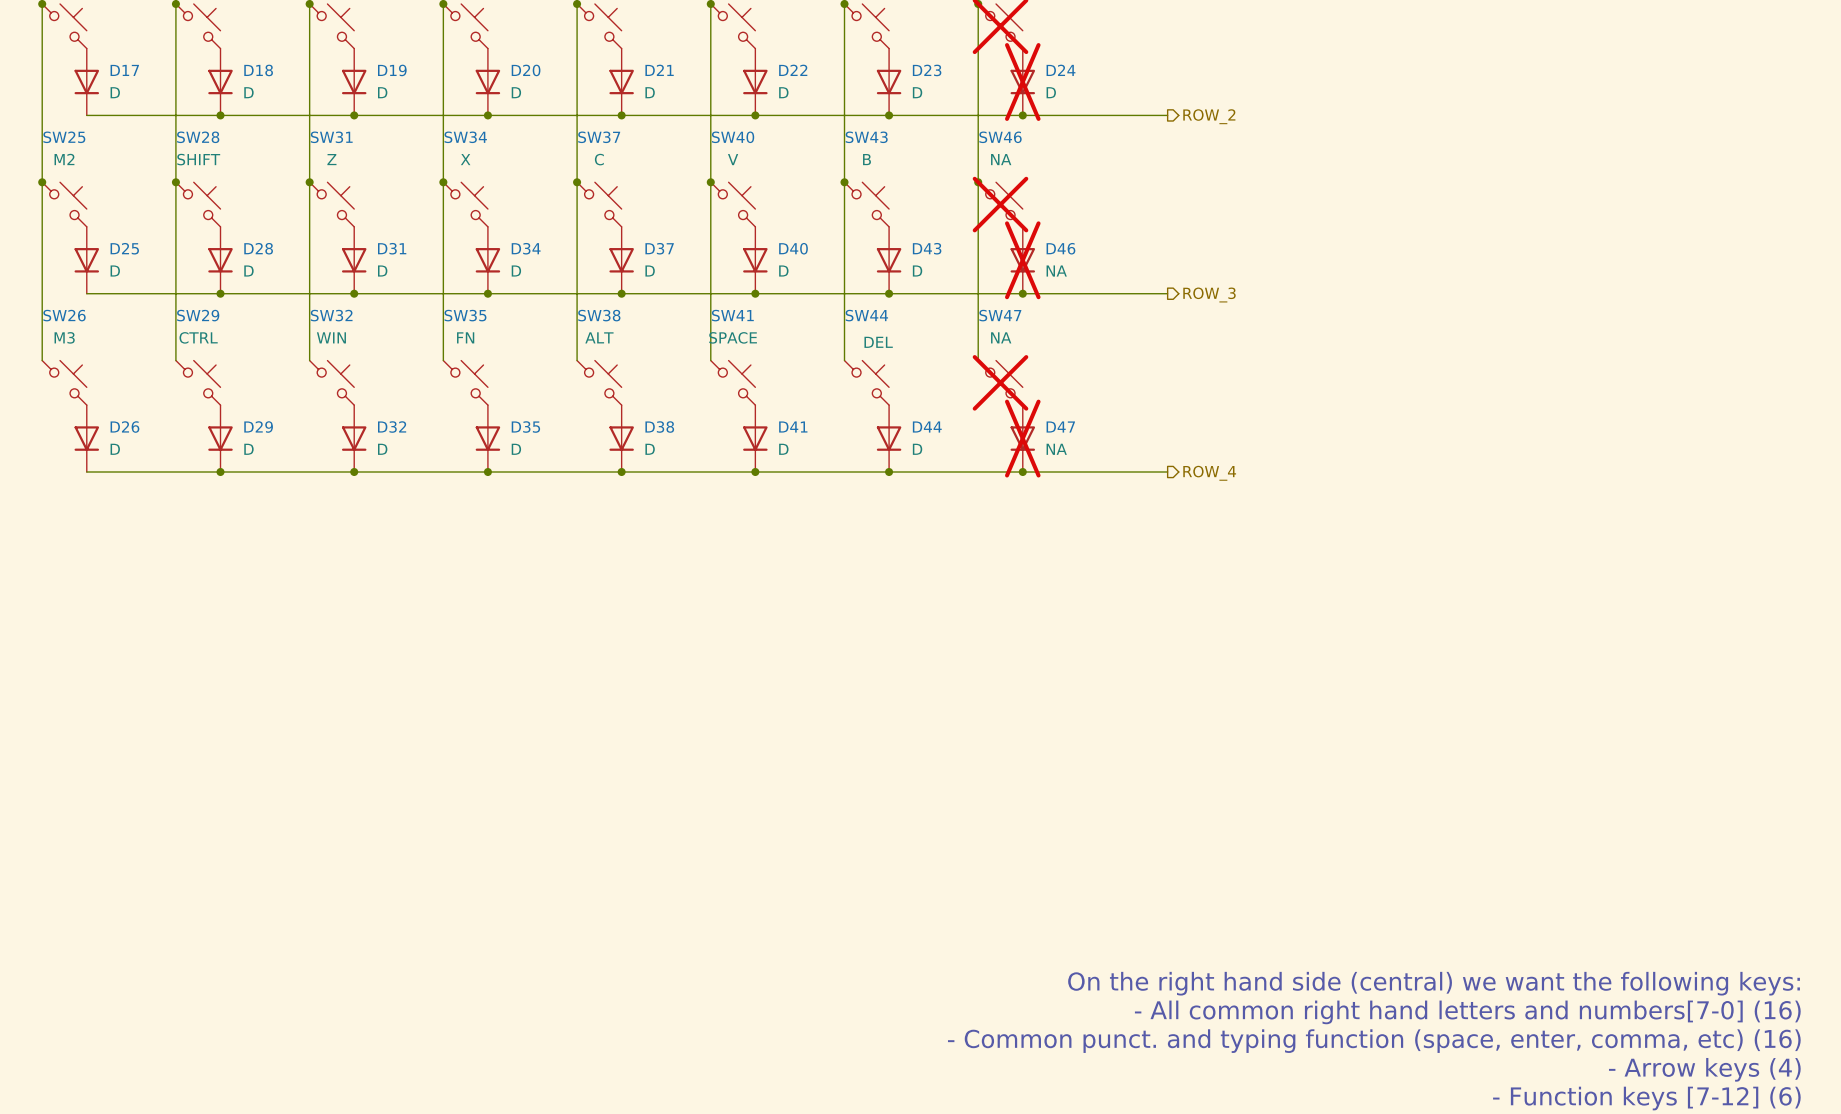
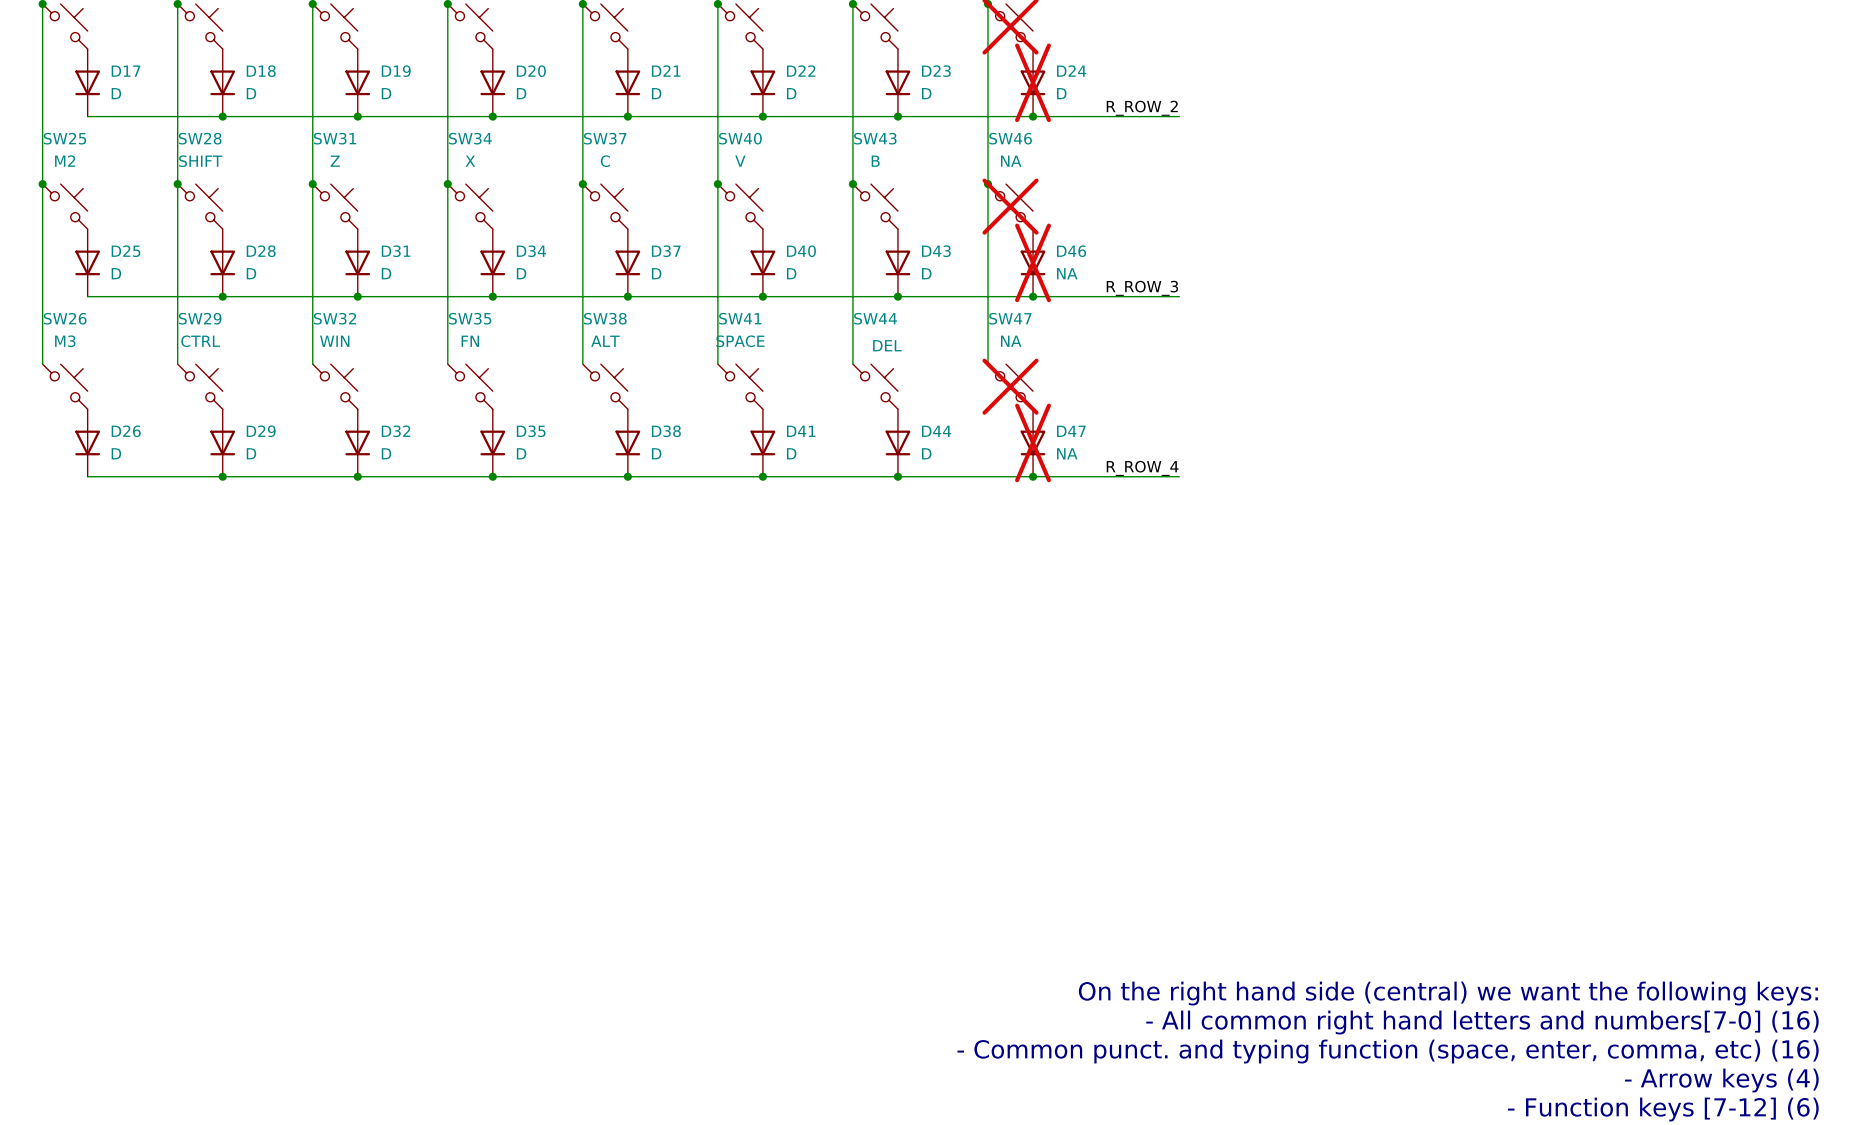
label: none -> R_ROW_2 (1142, 108)
hierarchical label: ROW_2 (1209, 116) -> none
label: none -> R_ROW_3 (1142, 288)
hierarchical label: ROW_3 (1209, 294) -> none
label: none -> R_ROW_4 (1142, 468)
hierarchical label: ROW_4 (1209, 473) -> none

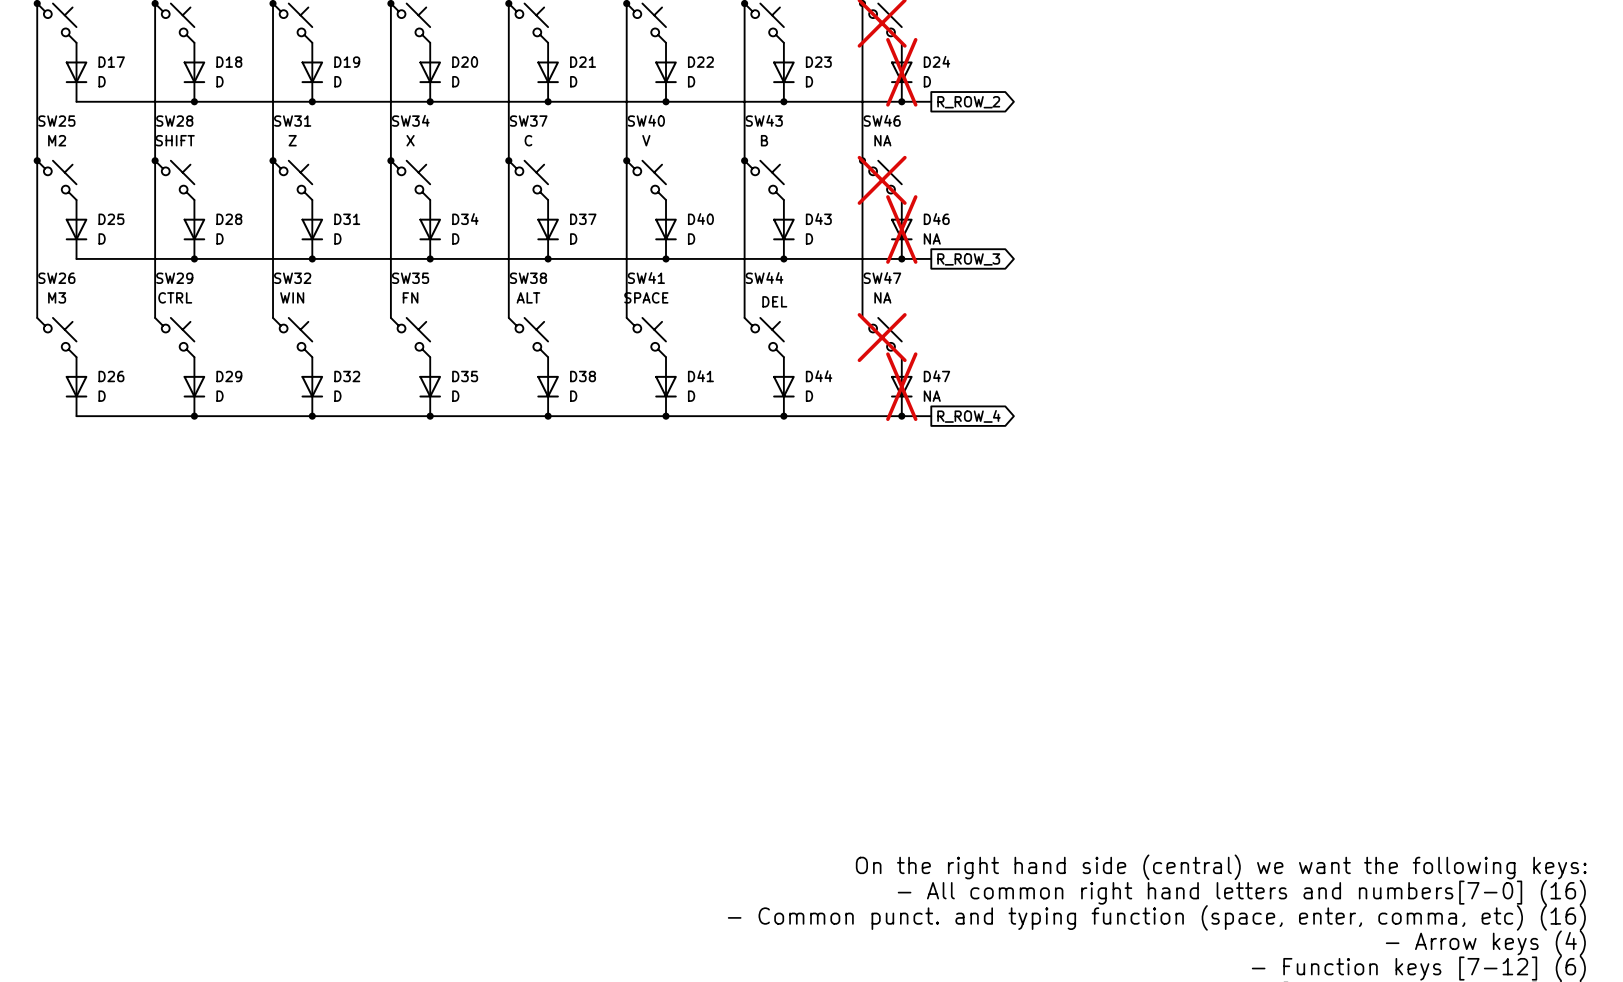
label: R_ROW_2 (1142, 108) -> none
wire: (1066, 116) (1179, 116) -> none
global label: none -> R_ROW_2 (968, 102)
label: R_ROW_3 (1142, 288) -> none
wire: (1066, 296) (1179, 296) -> none
global label: none -> R_ROW_3 (968, 259)
label: R_ROW_4 (1142, 468) -> none
wire: (1066, 476) (1179, 476) -> none
global label: none -> R_ROW_4 (968, 416)

